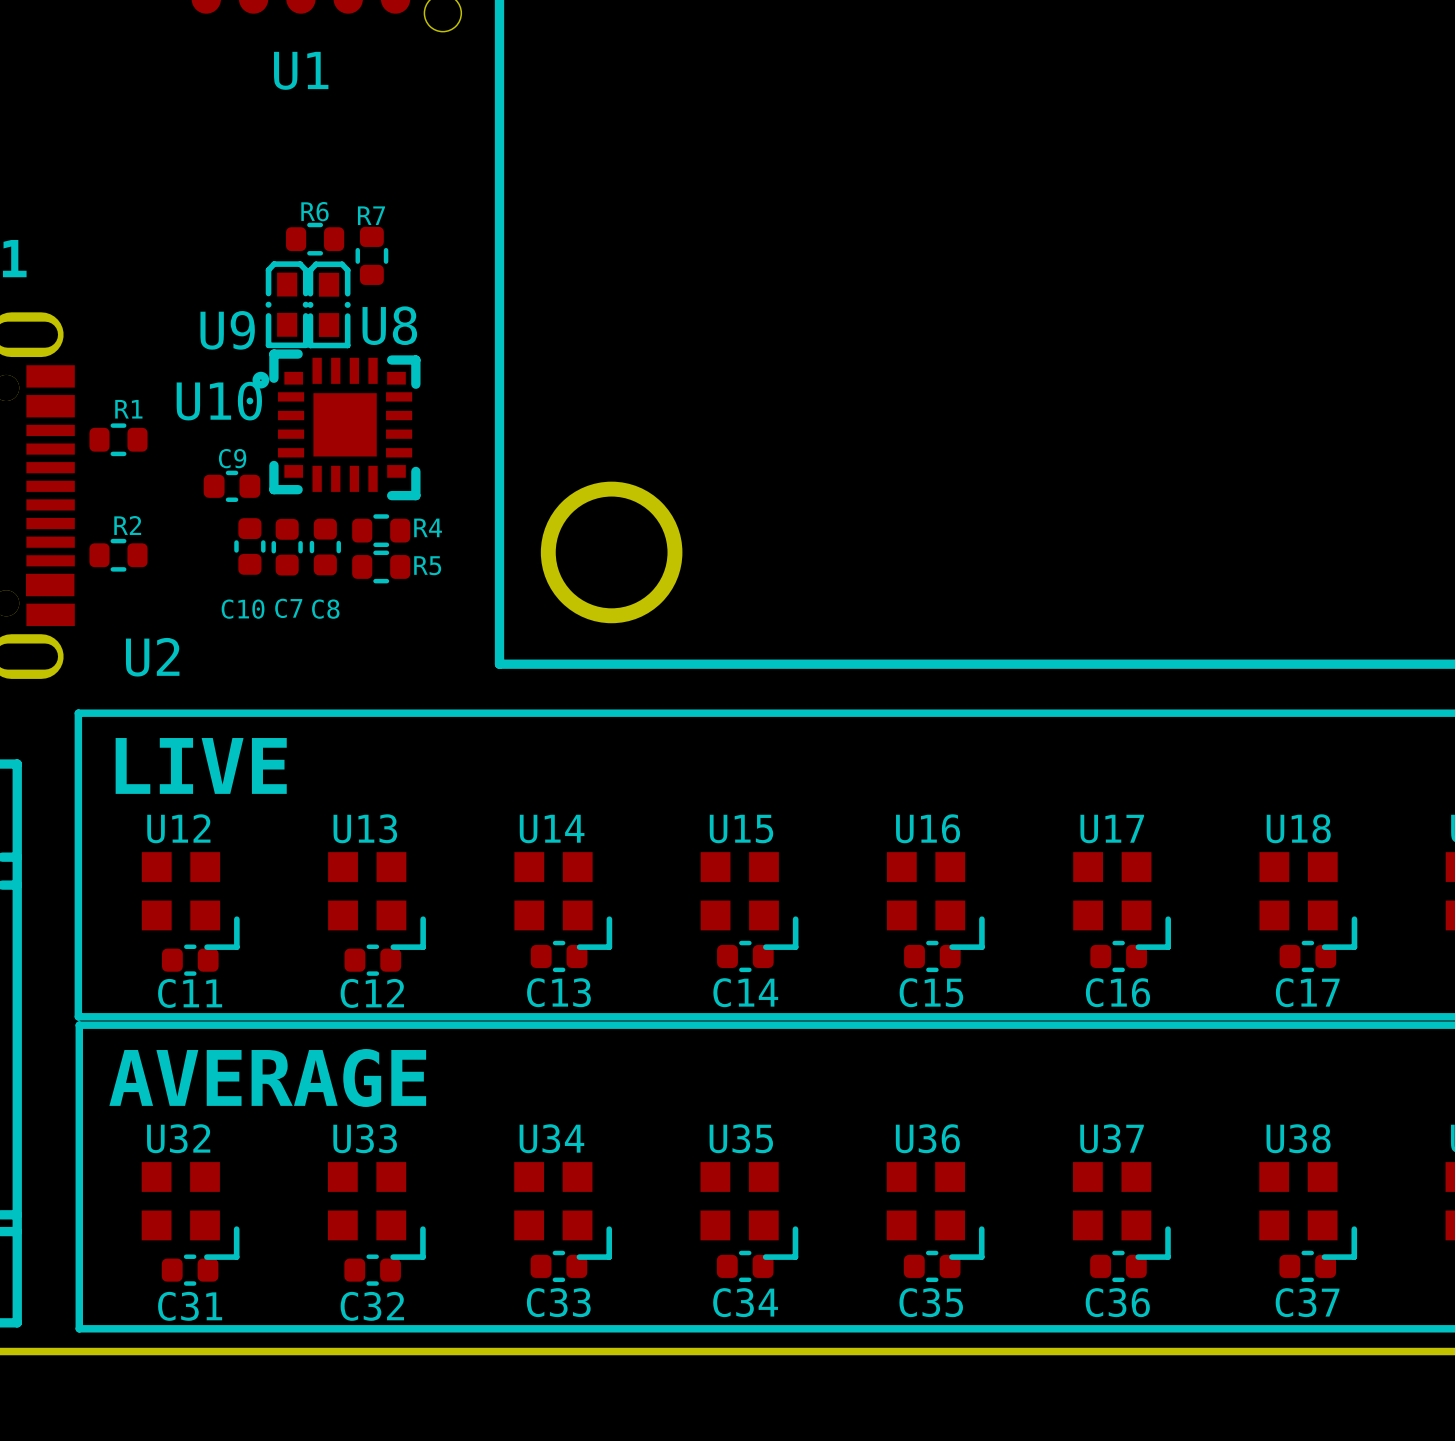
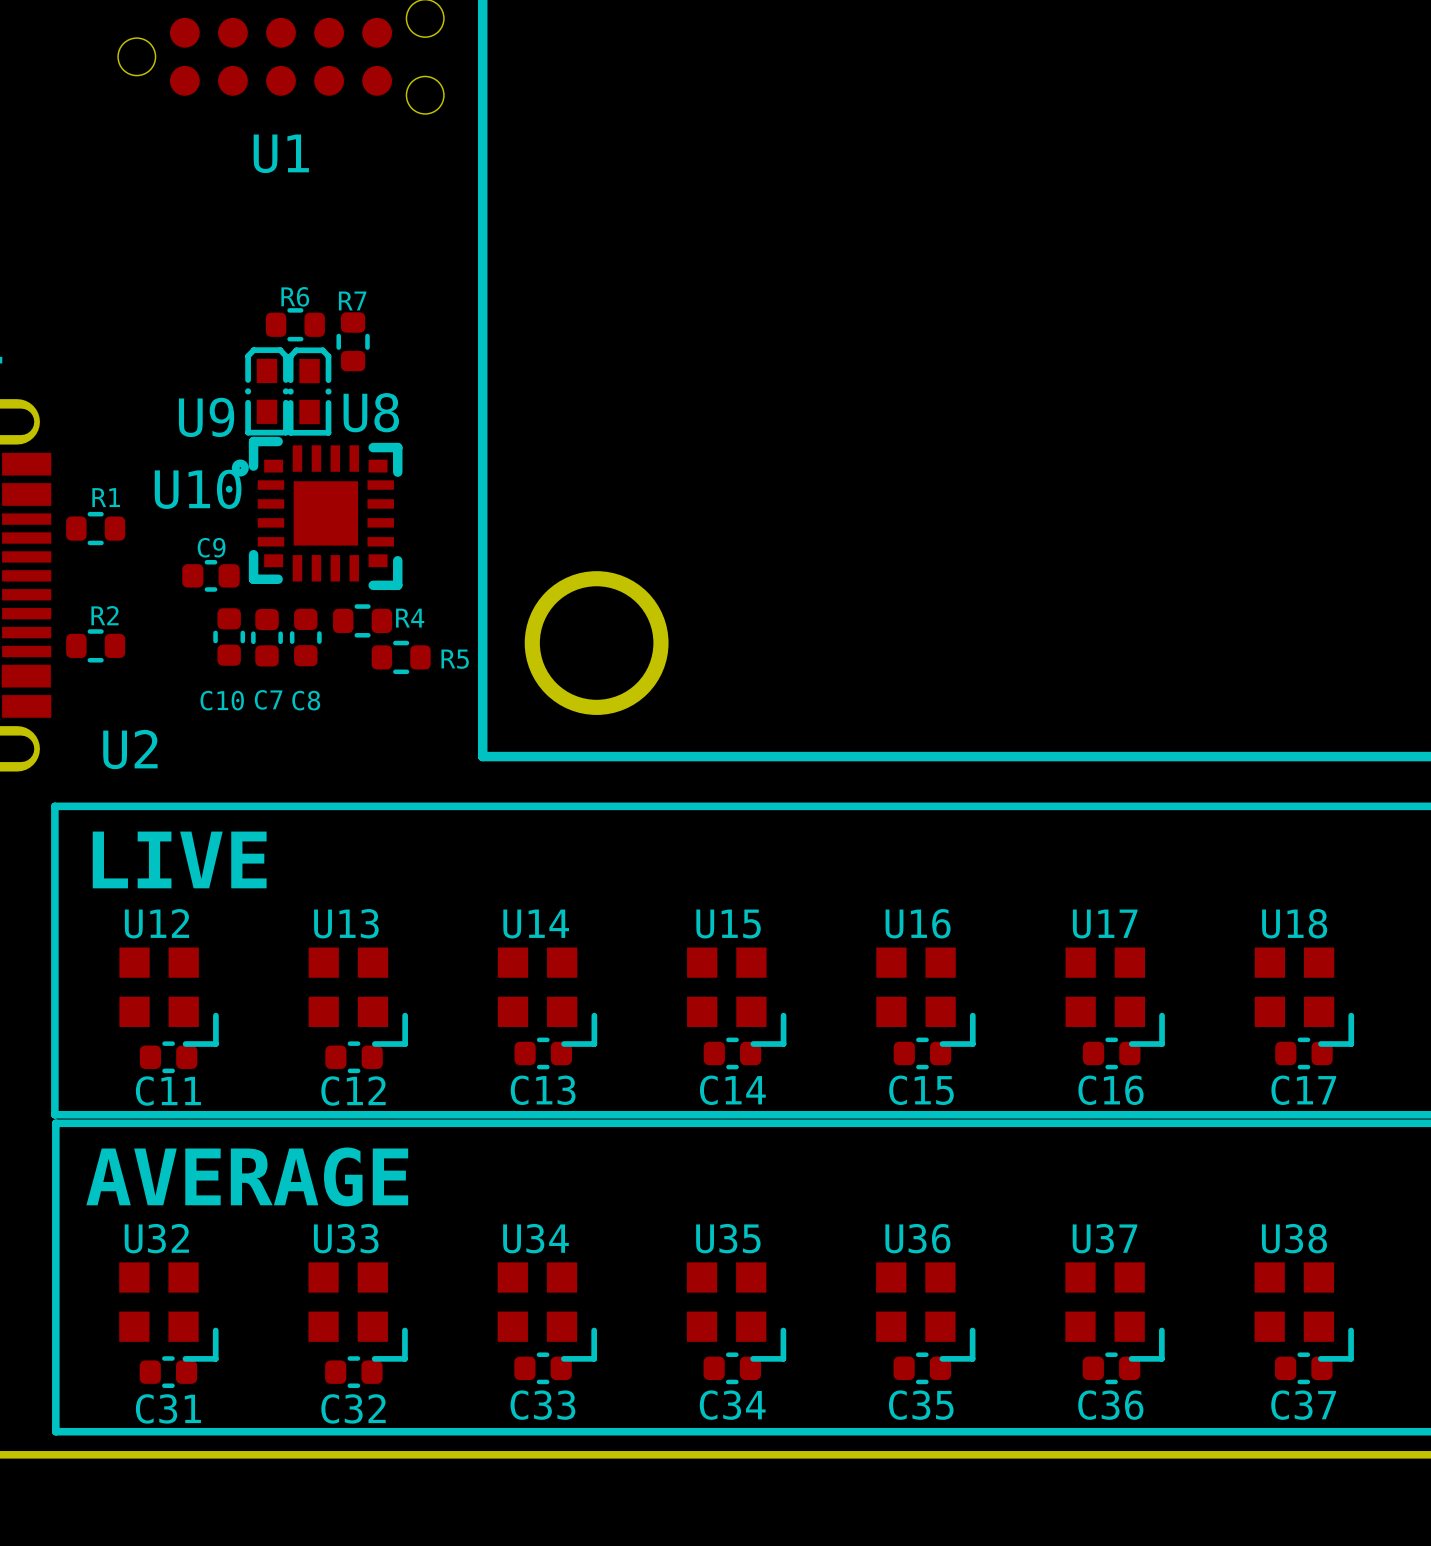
R5 name position: R5 (427, 565) -> R5 (455, 659)
R5 position: (381, 566) -> (401, 657)

